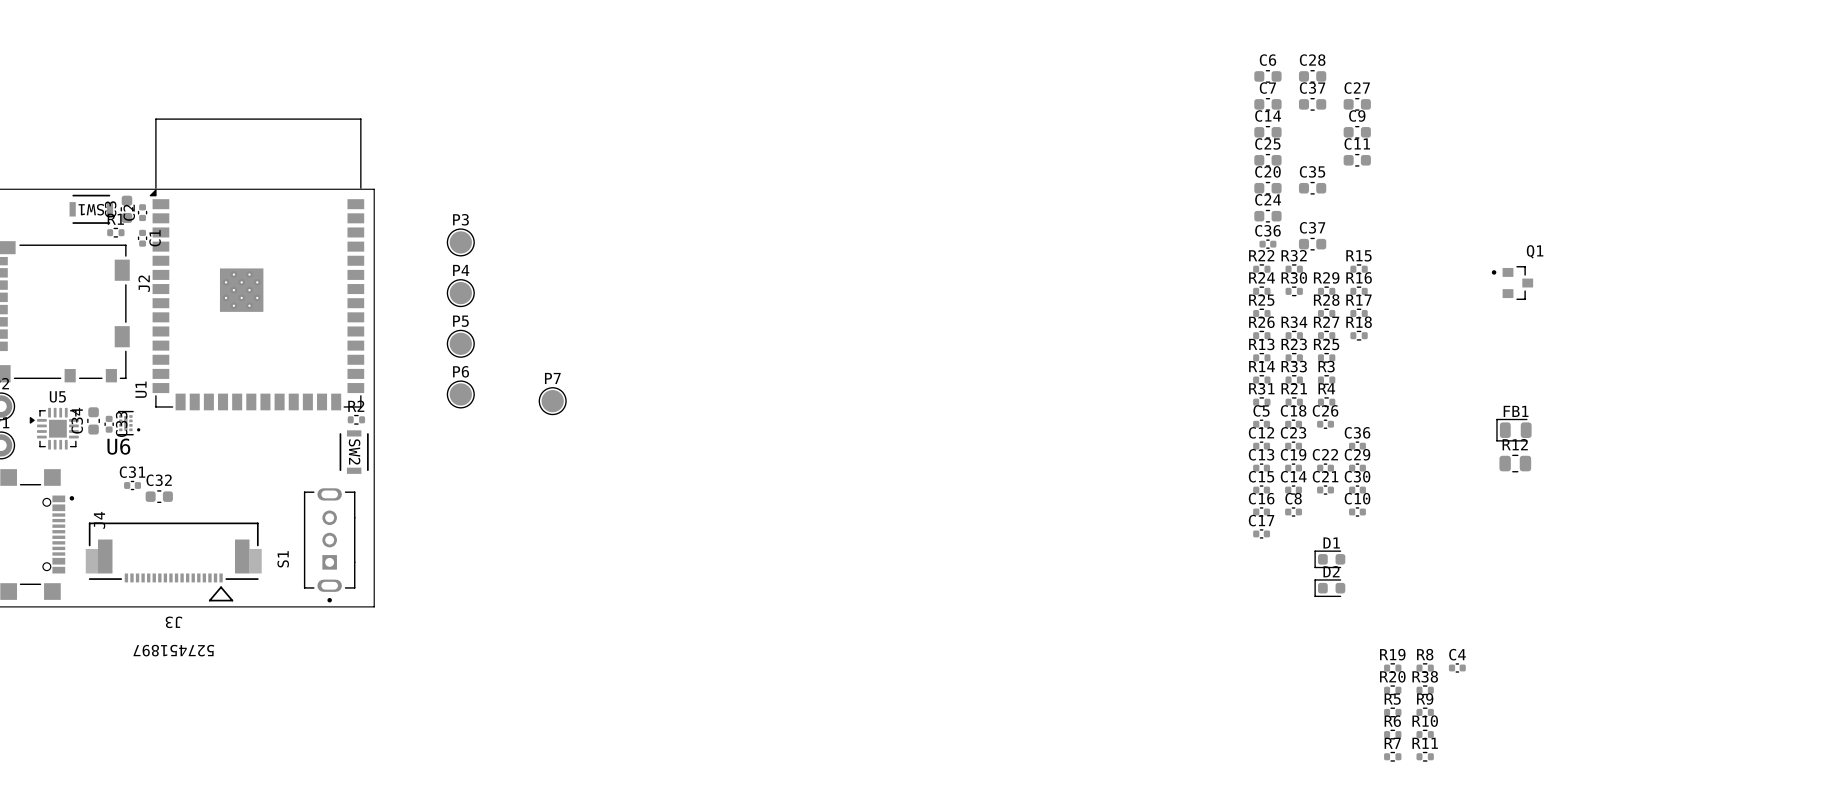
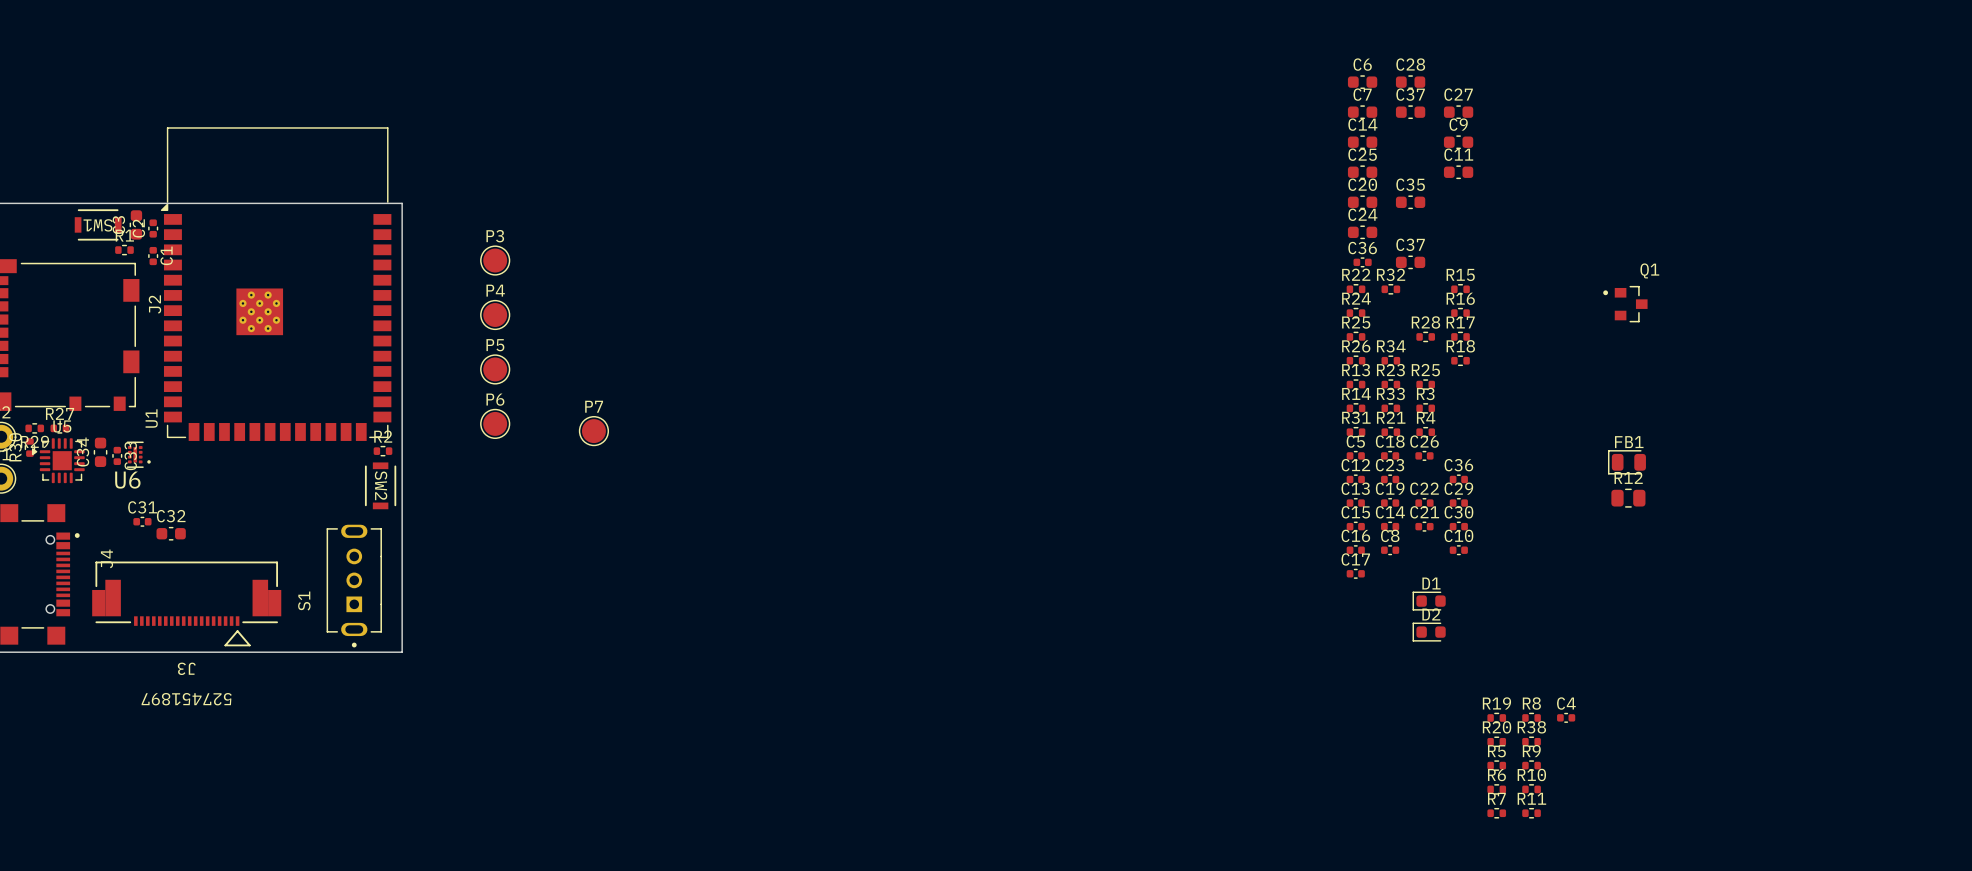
R29 name position: R29 (1326, 277) -> R29 (34, 441)
R30 rotation: 0° (1294, 291) -> 90° clockwise (29, 447)
R30 position: (1294, 291) -> (29, 447)
R29 position: (1326, 291) -> (34, 428)
R27 position: (1326, 335) -> (59, 428)

